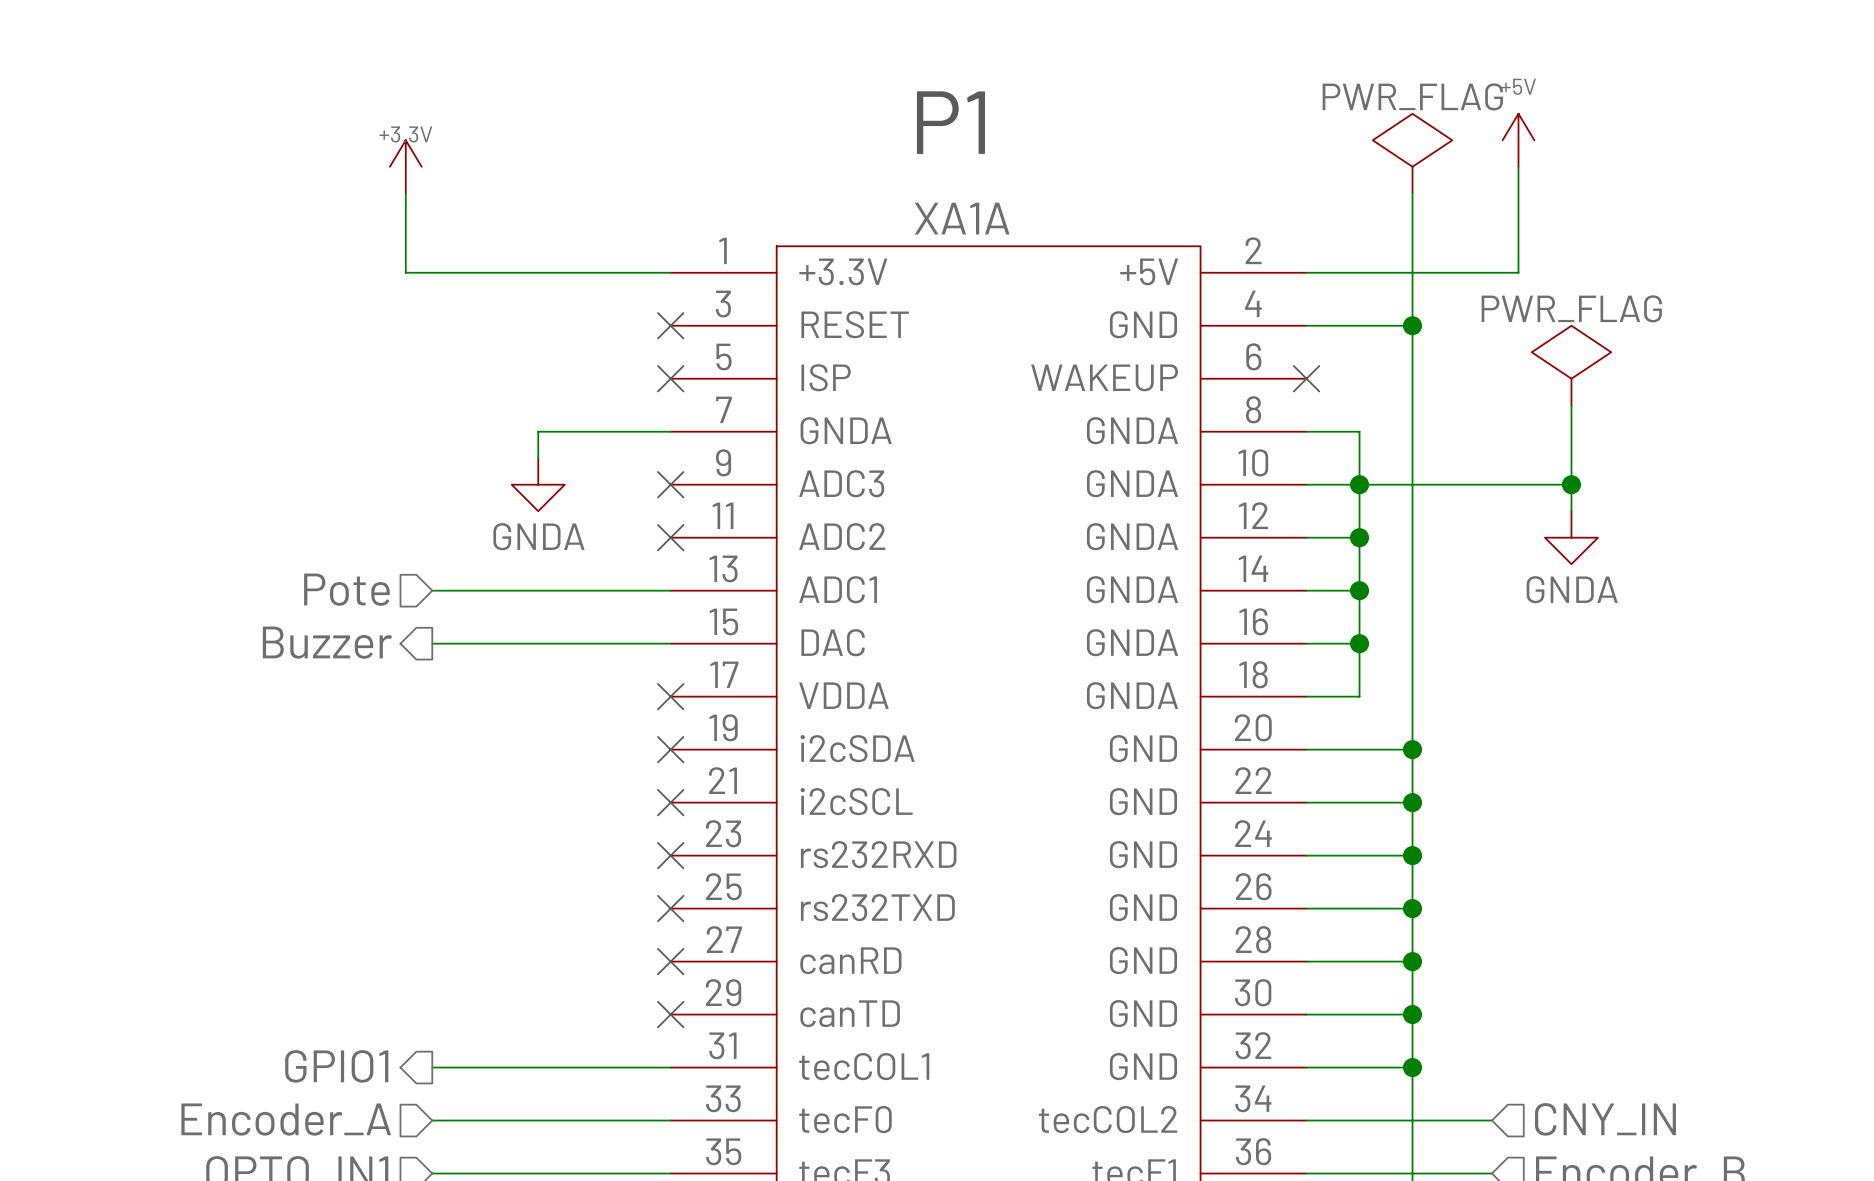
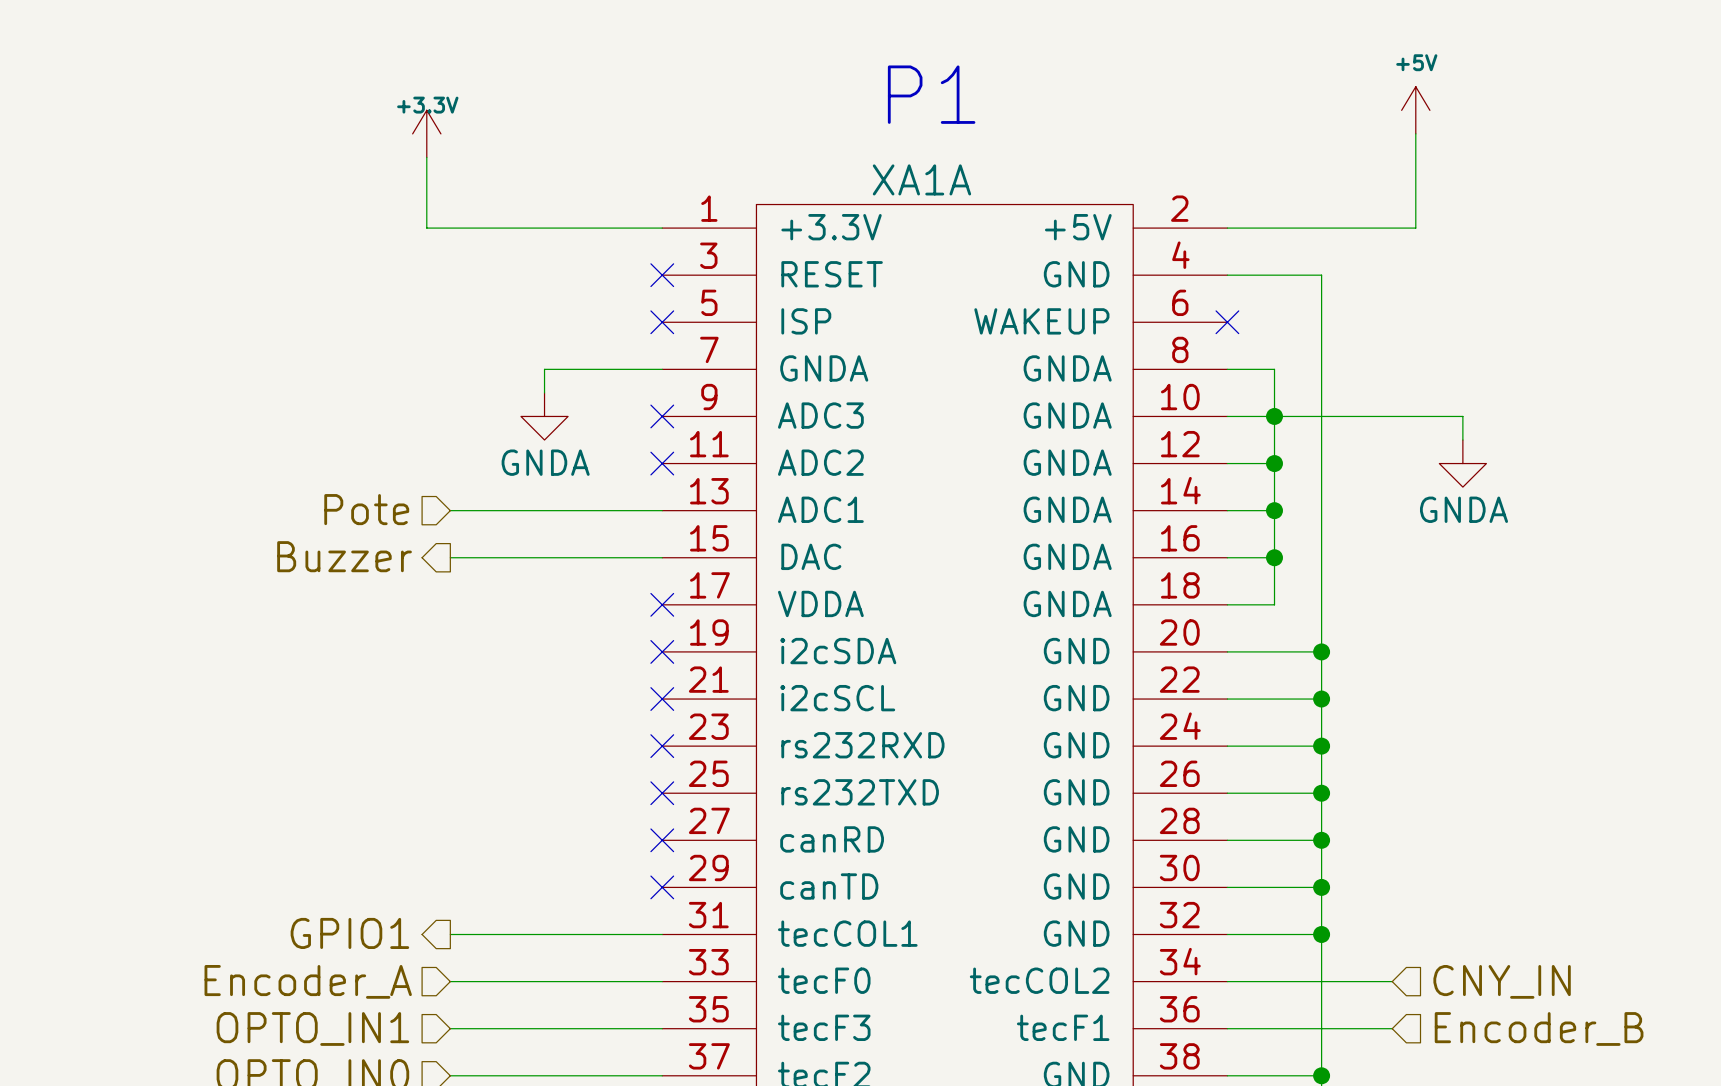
power symbol: PWR_FLAG (1412, 153) -> none
wire: (1412, 193) (1412, 325) -> none
junction: (1412, 325) -> none
power symbol: PWR_FLAG (1571, 365) -> none
wire: (1571, 405) (1571, 484) -> none
junction: (1571, 484) -> none

